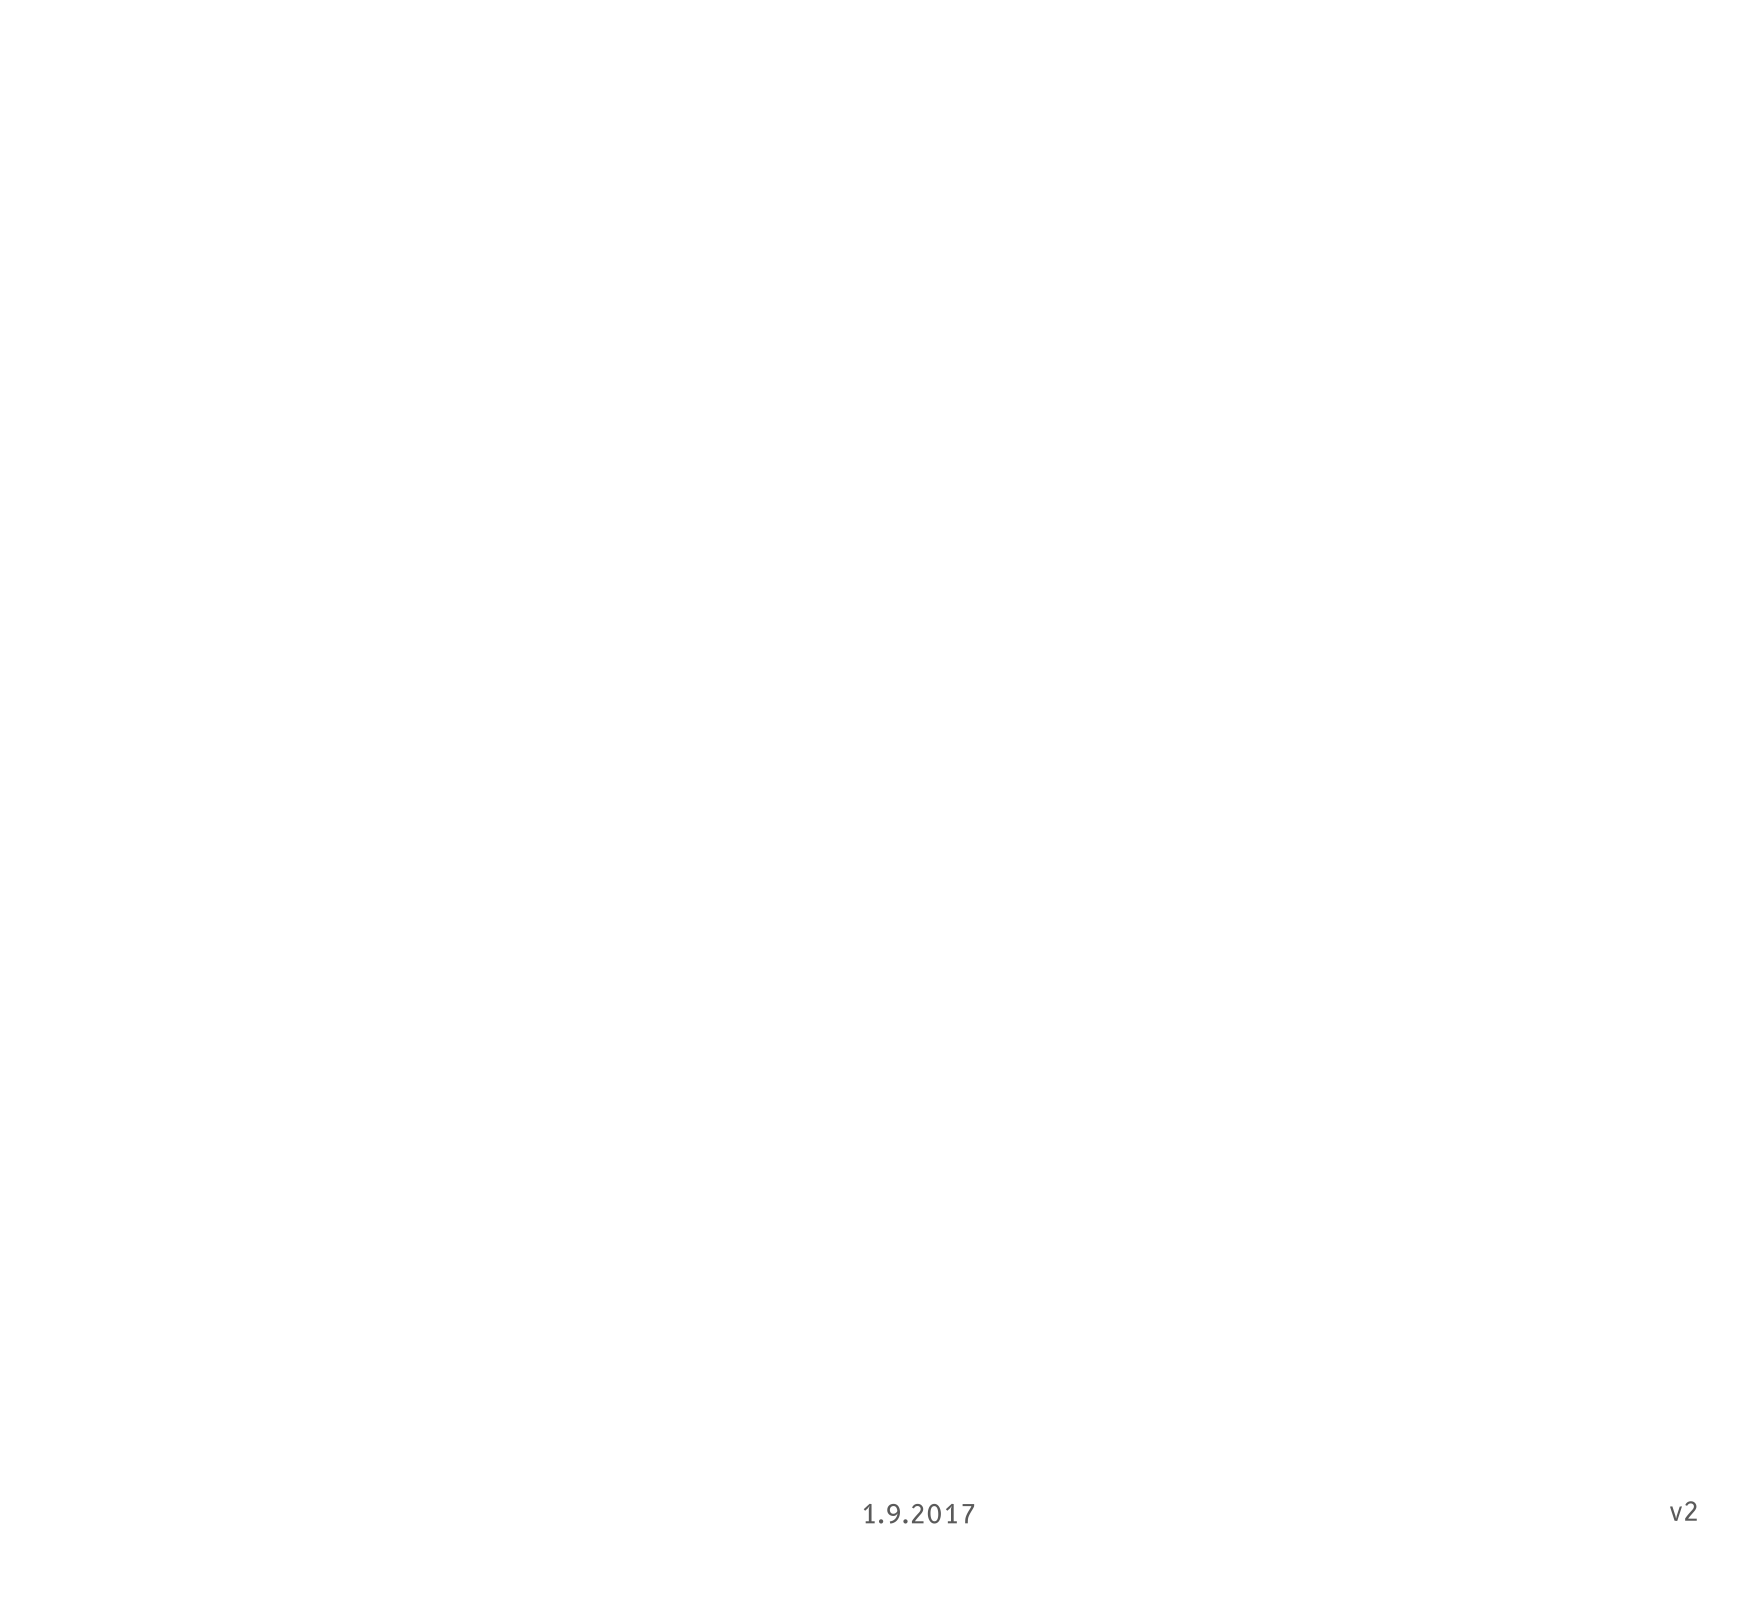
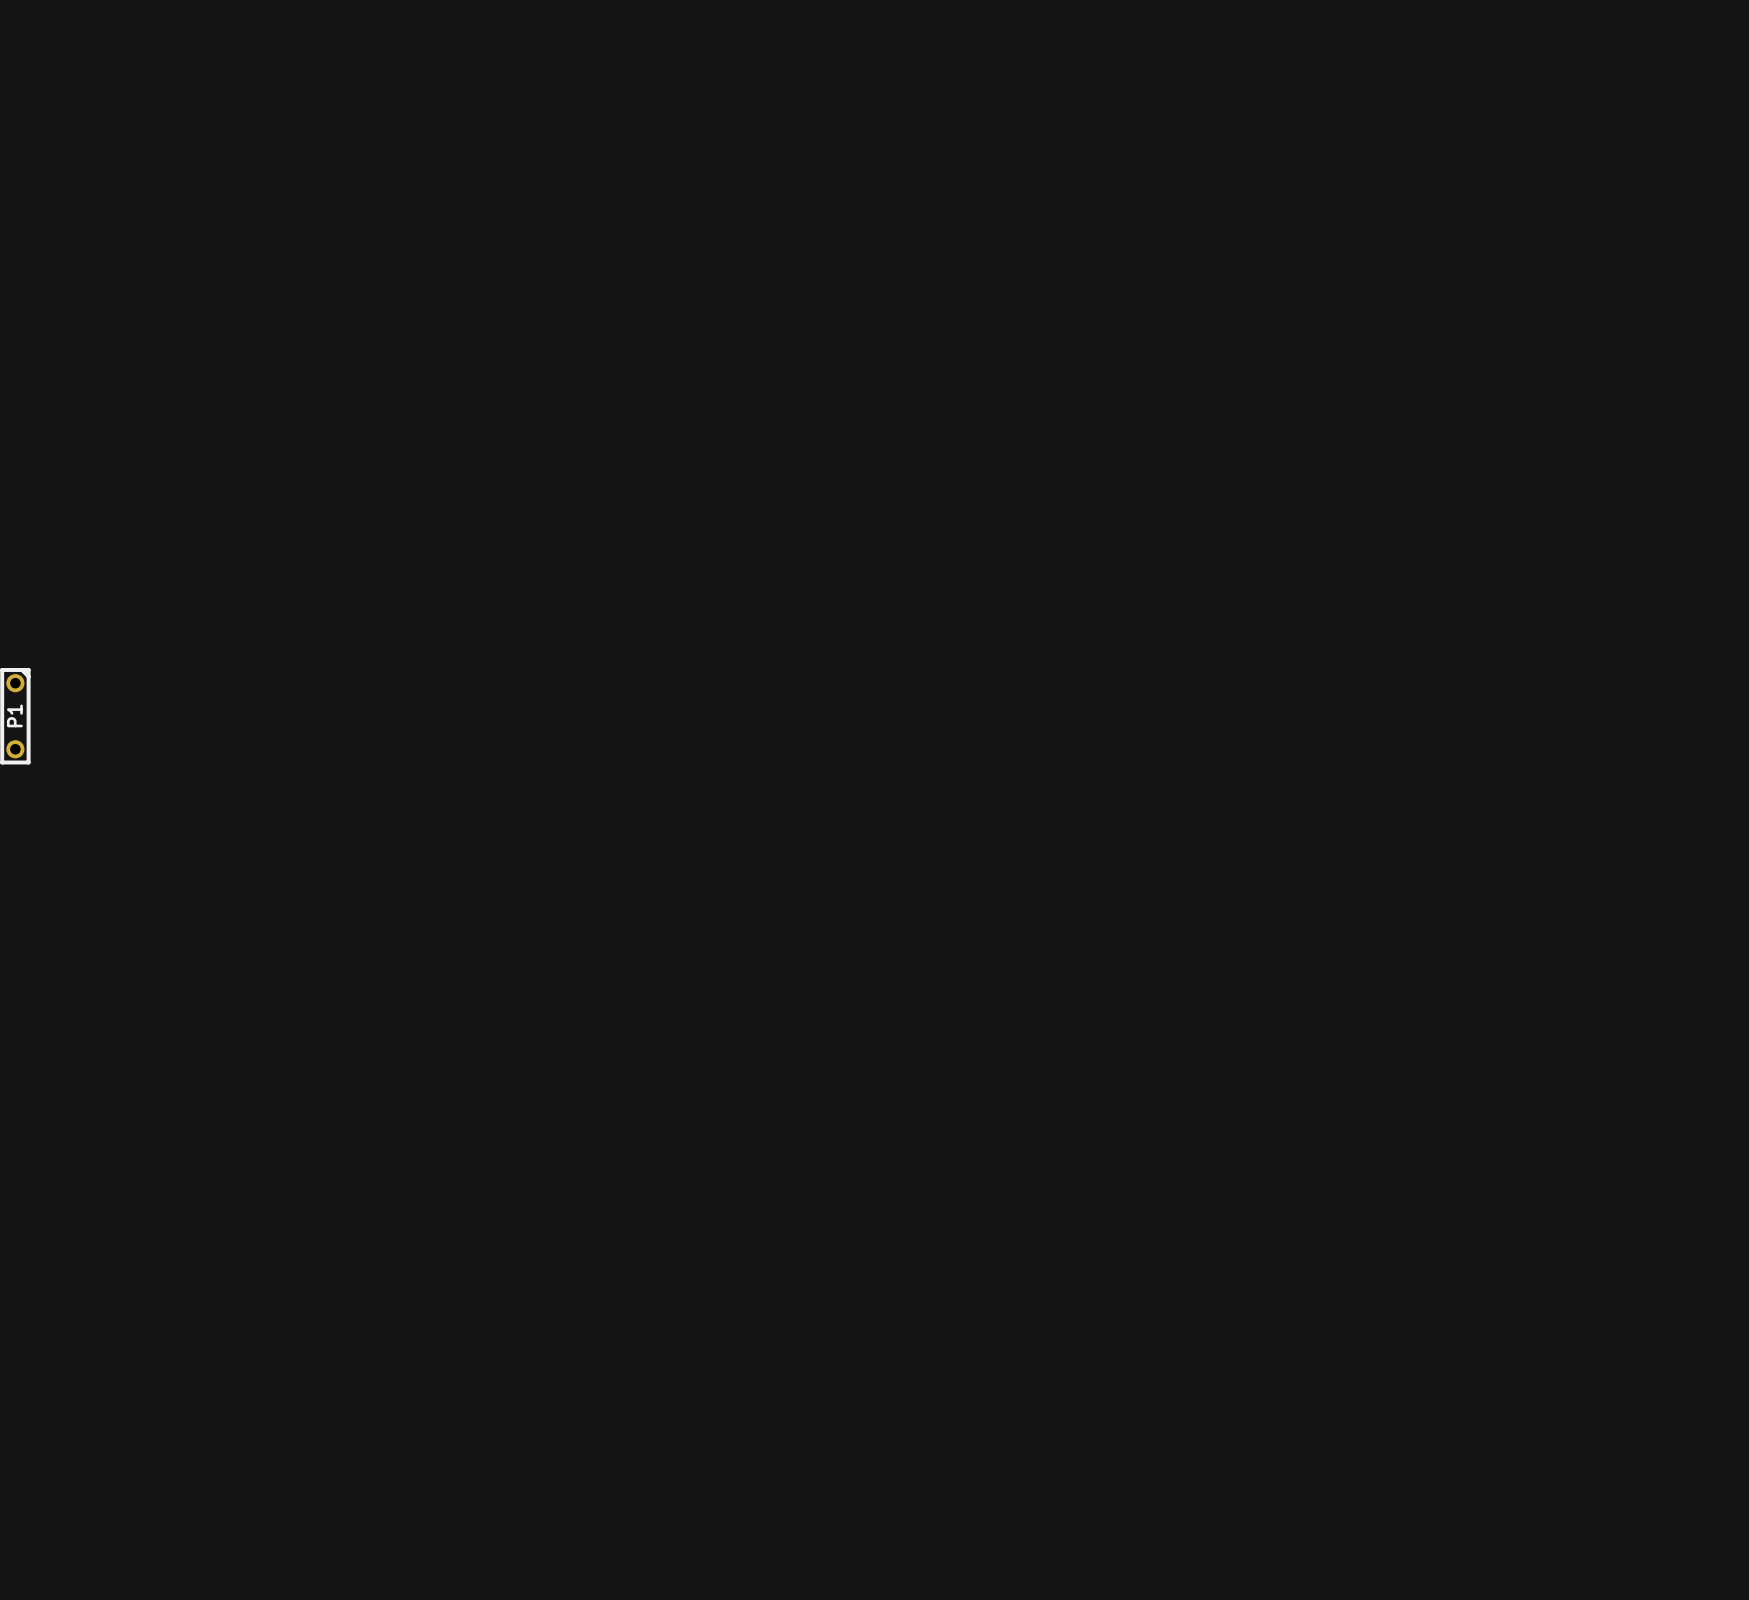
P1: none -> (15, 716)
text: v2 (1683, 1511) -> none
text: 1.9.2017 (918, 1513) -> none

